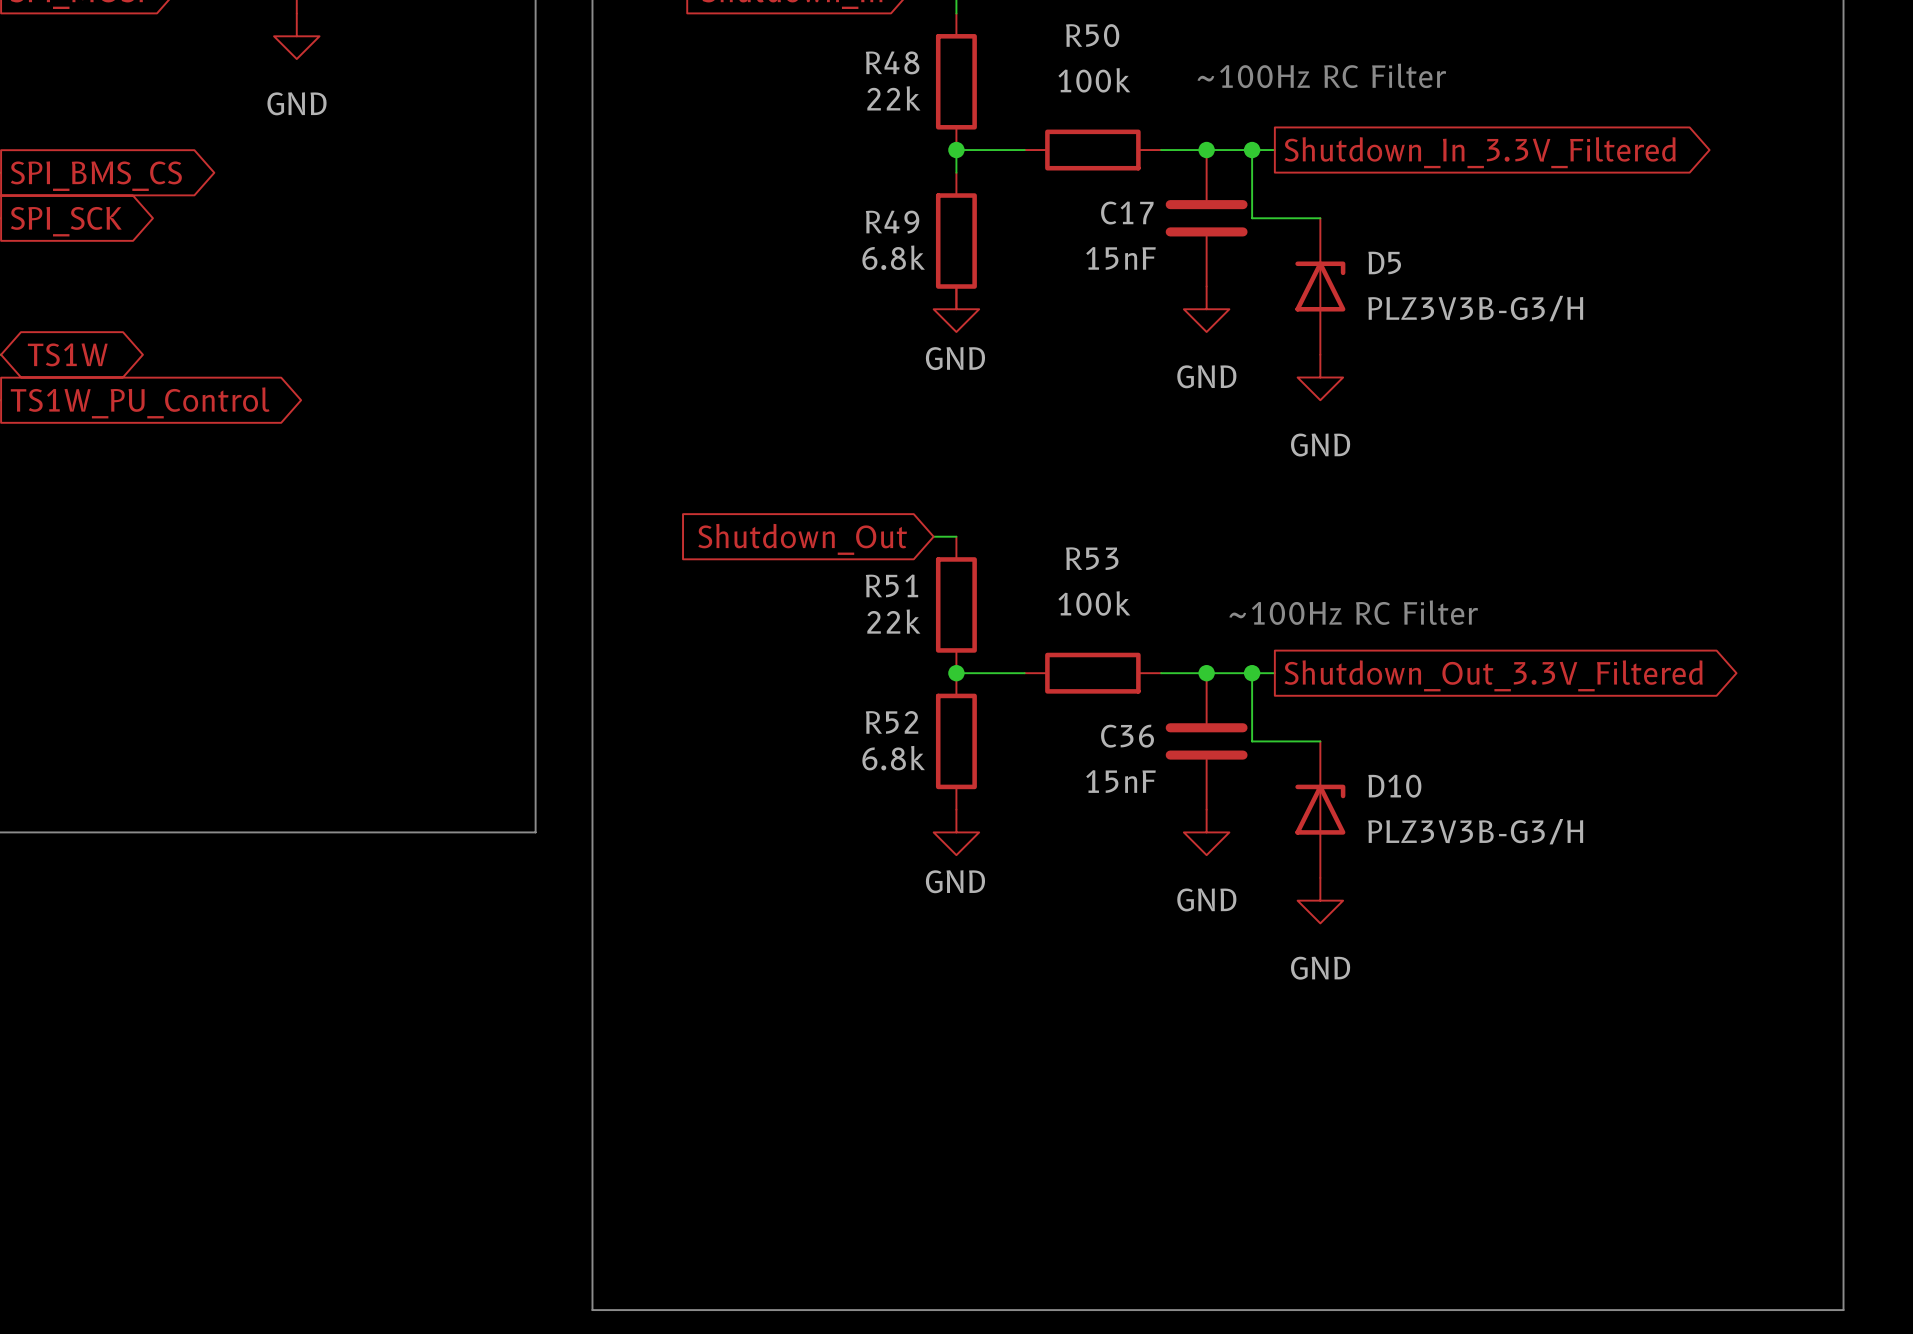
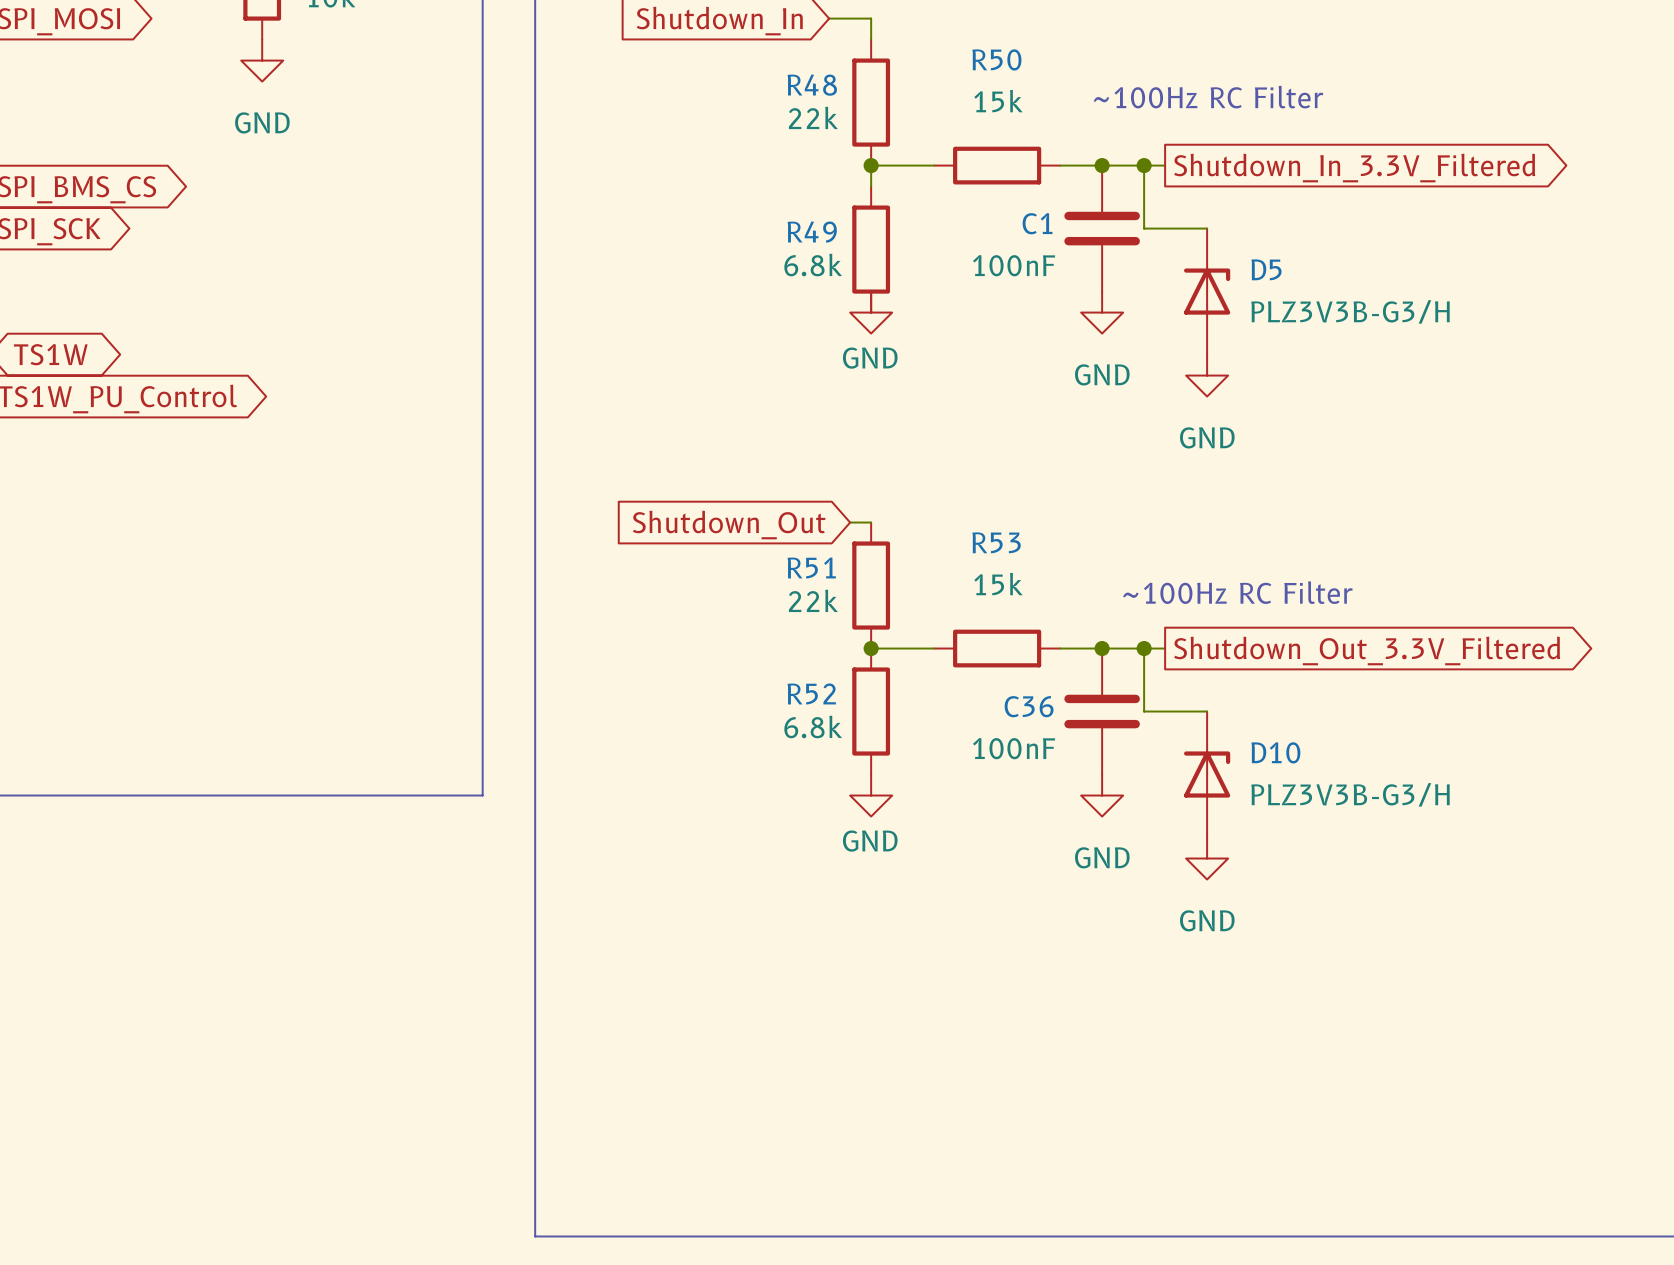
R50 value: 100k (1094, 80) -> 15k (998, 101)
C17 name: C17 (1127, 212) -> C1 (1037, 223)
C17 value: 15nF (1120, 258) -> 100nF (1014, 265)
R53 value: 100k (1094, 603) -> 15k (998, 584)
C36 value: 15nF (1120, 781) -> 100nF (1014, 748)

